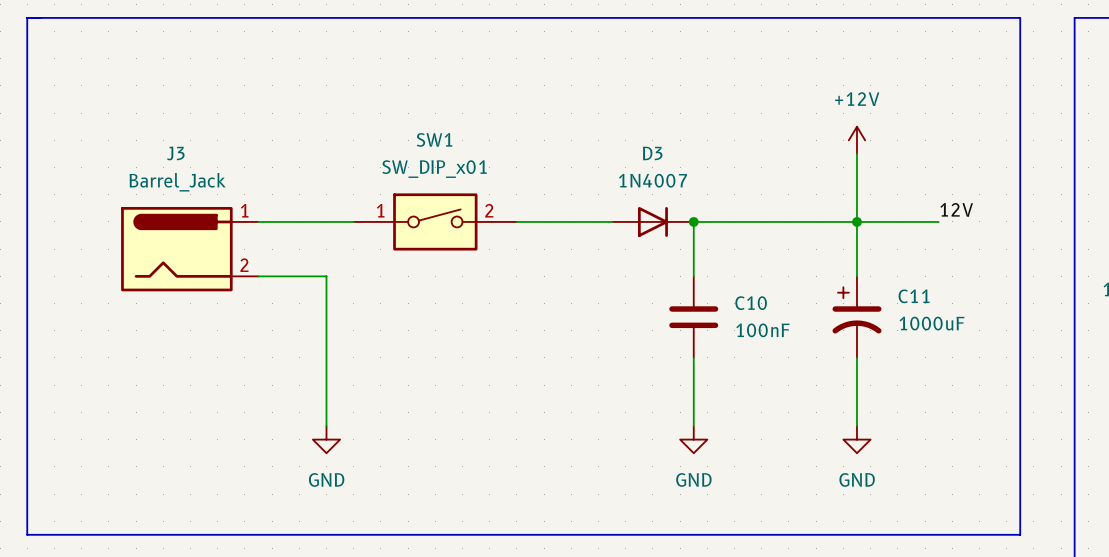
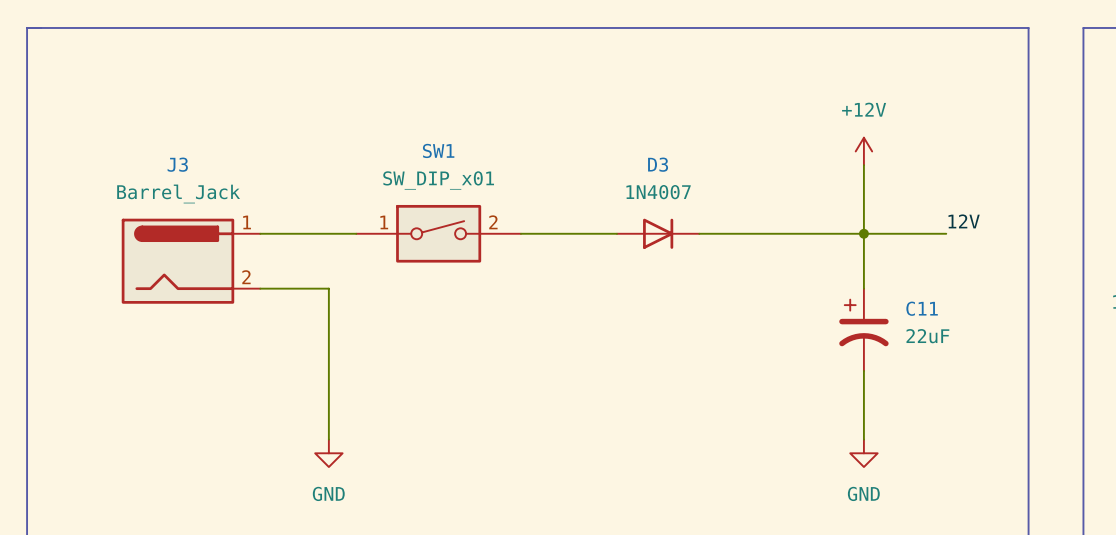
wire: (693, 221) (693, 276) -> none
junction: (693, 221) -> none
C10: 100nF (693, 317) -> none
C11 value: 1000uF (931, 323) -> 22uF (927, 336)
wire: (693, 357) (693, 425) -> none
power symbol: GND (693, 439) -> none

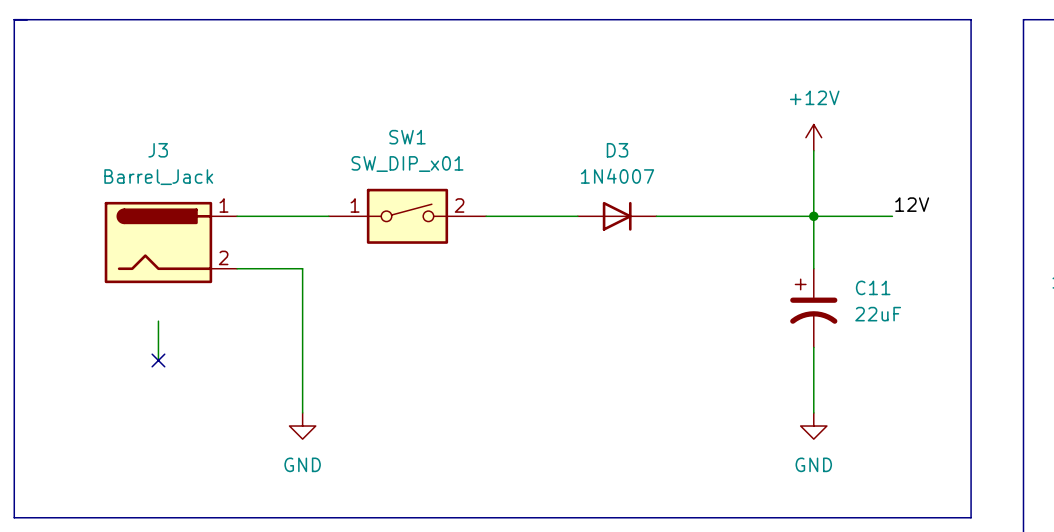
wire: none -> (158, 321) (158, 360)
no-connect mark: none -> (158, 360)

